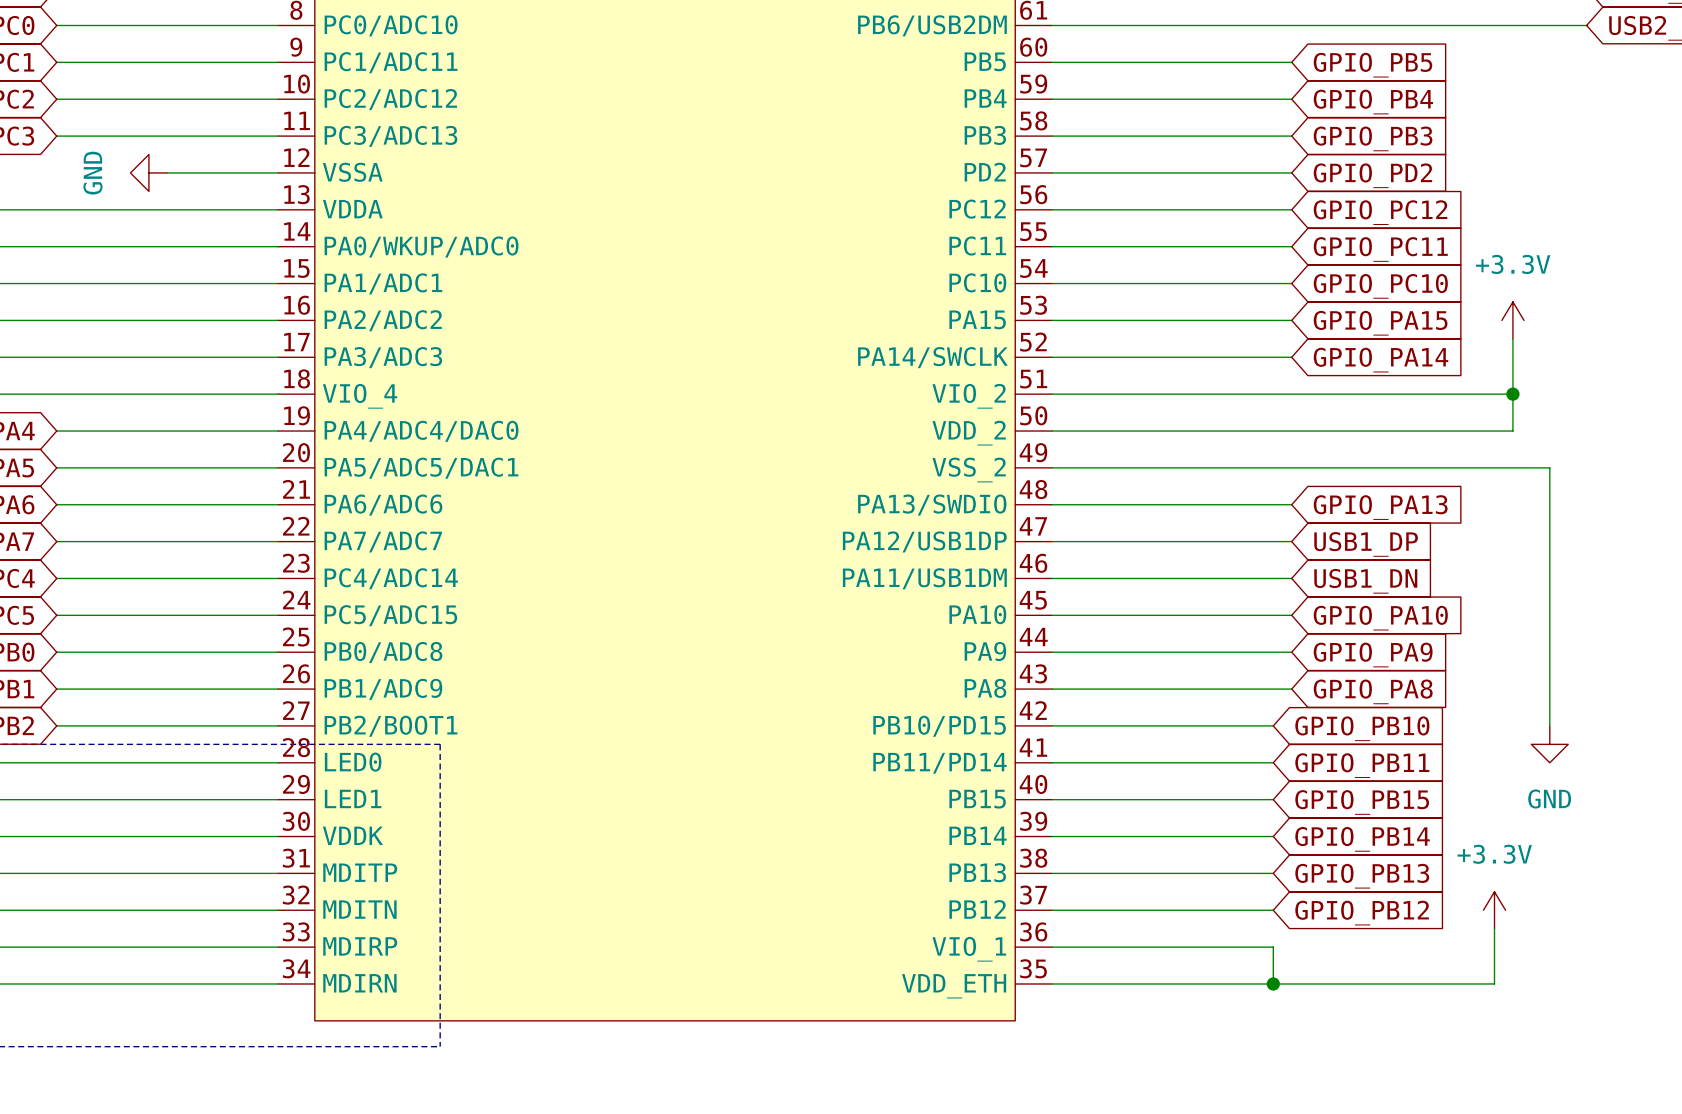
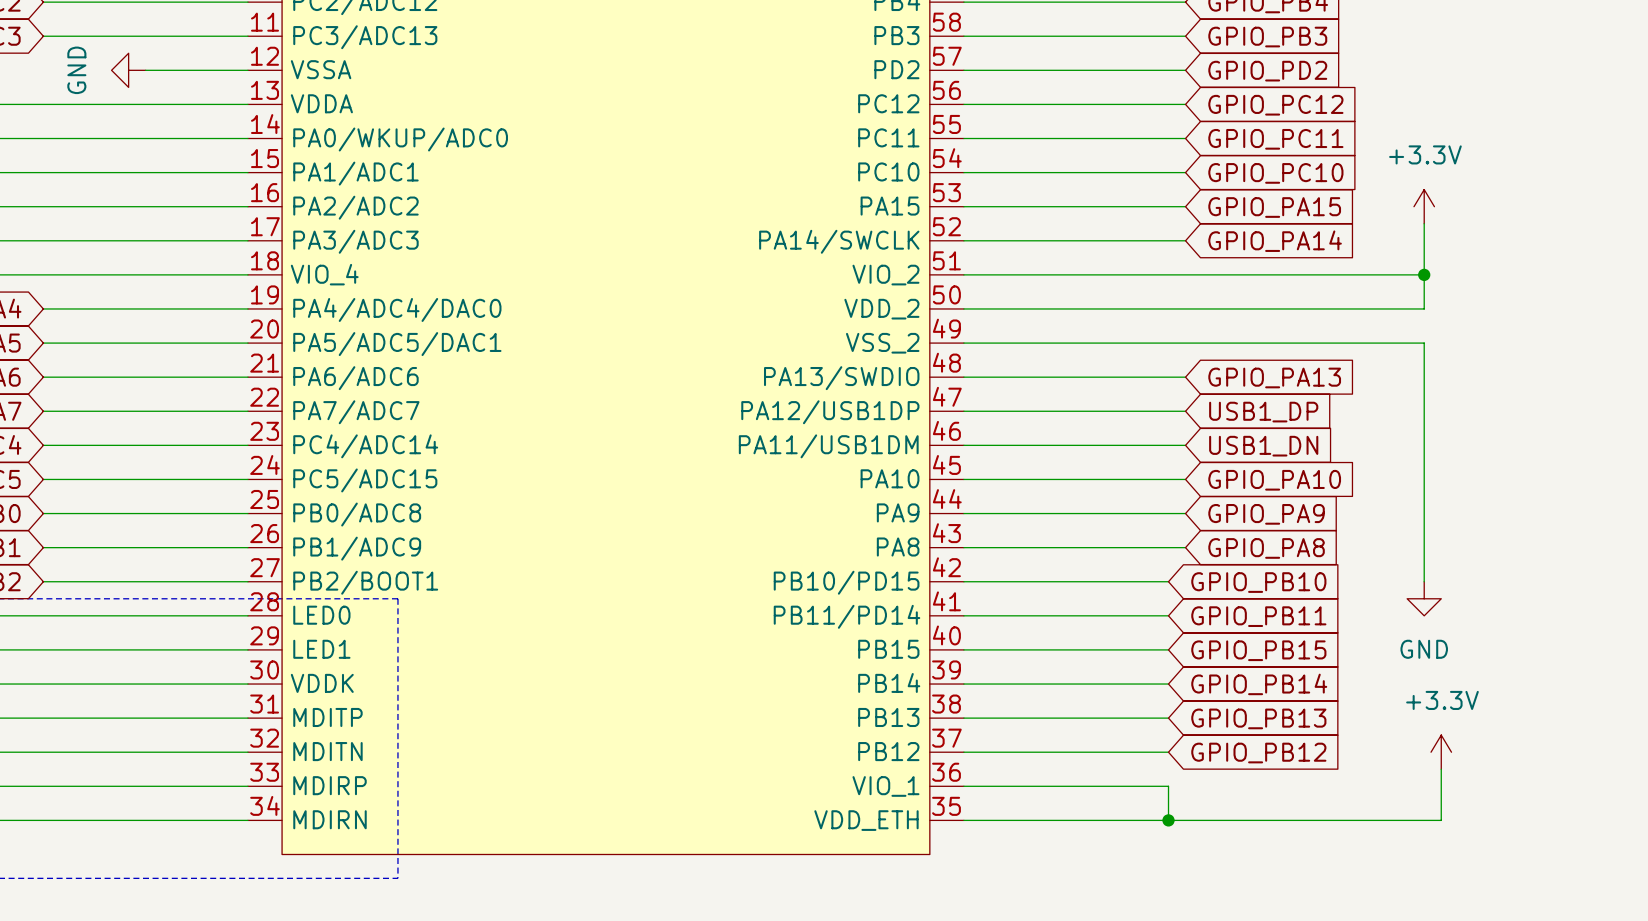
power symbol position: +3.3V (1512, 320) -> +3.3V (1424, 206)
wire: (1512, 338) (1512, 431) -> (1424, 223) (1424, 308) (1390, 308)
wire: none -> (1390, 274) (1424, 274)
junction position: (1512, 394) -> (1424, 274)
power symbol position: +3.3V (1494, 910) -> +3.3V (1441, 752)
wire: (1494, 928) (1494, 983) -> (1441, 769) (1441, 820) (1373, 820)

